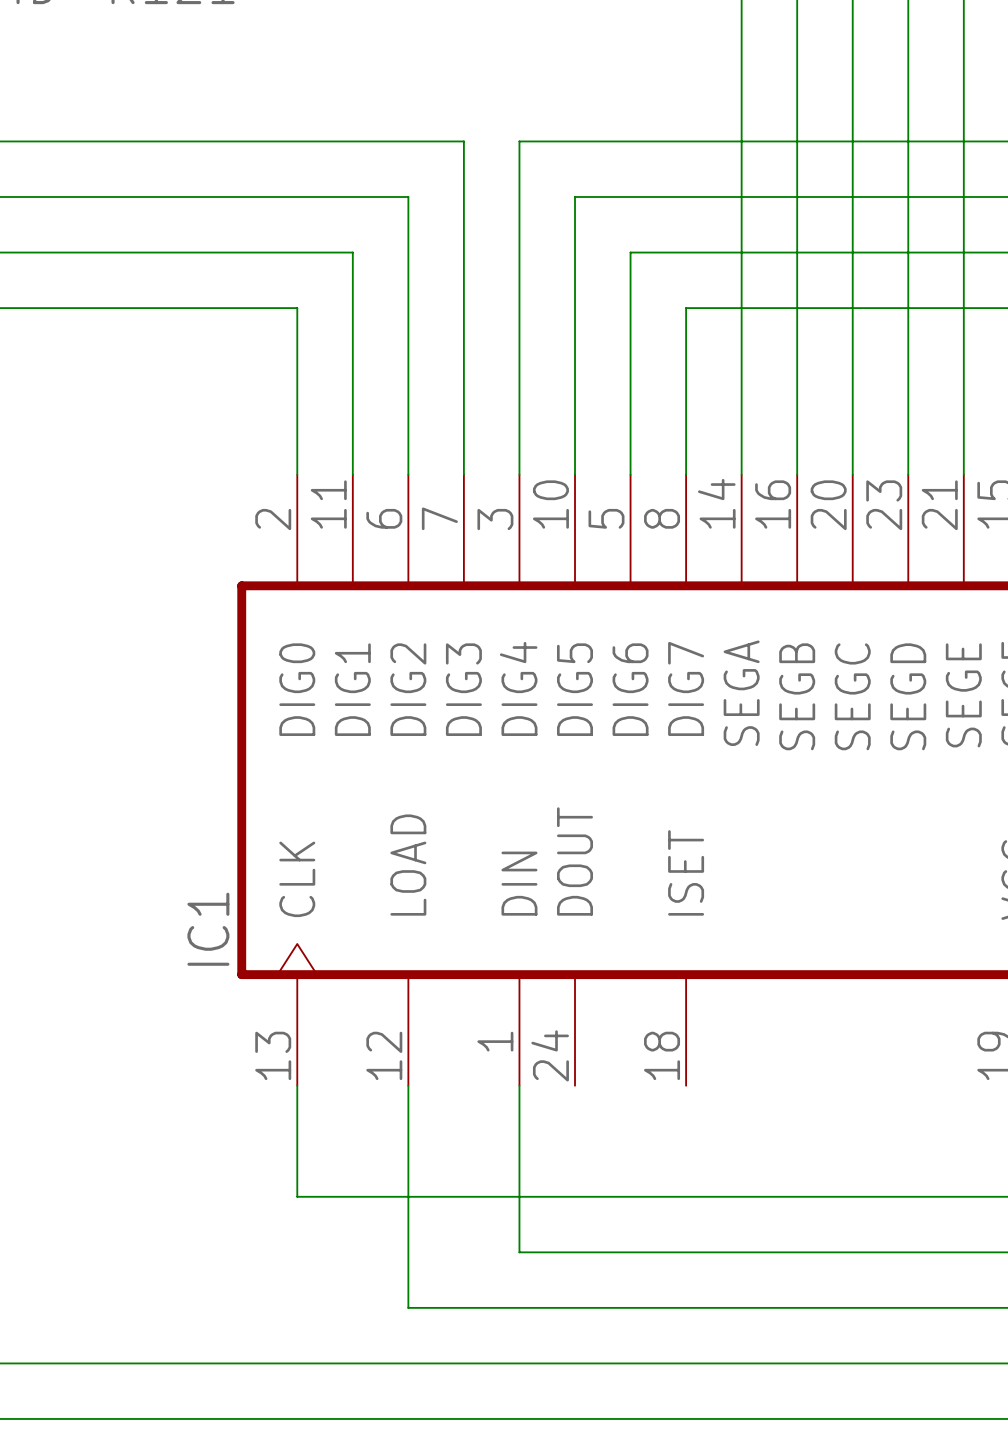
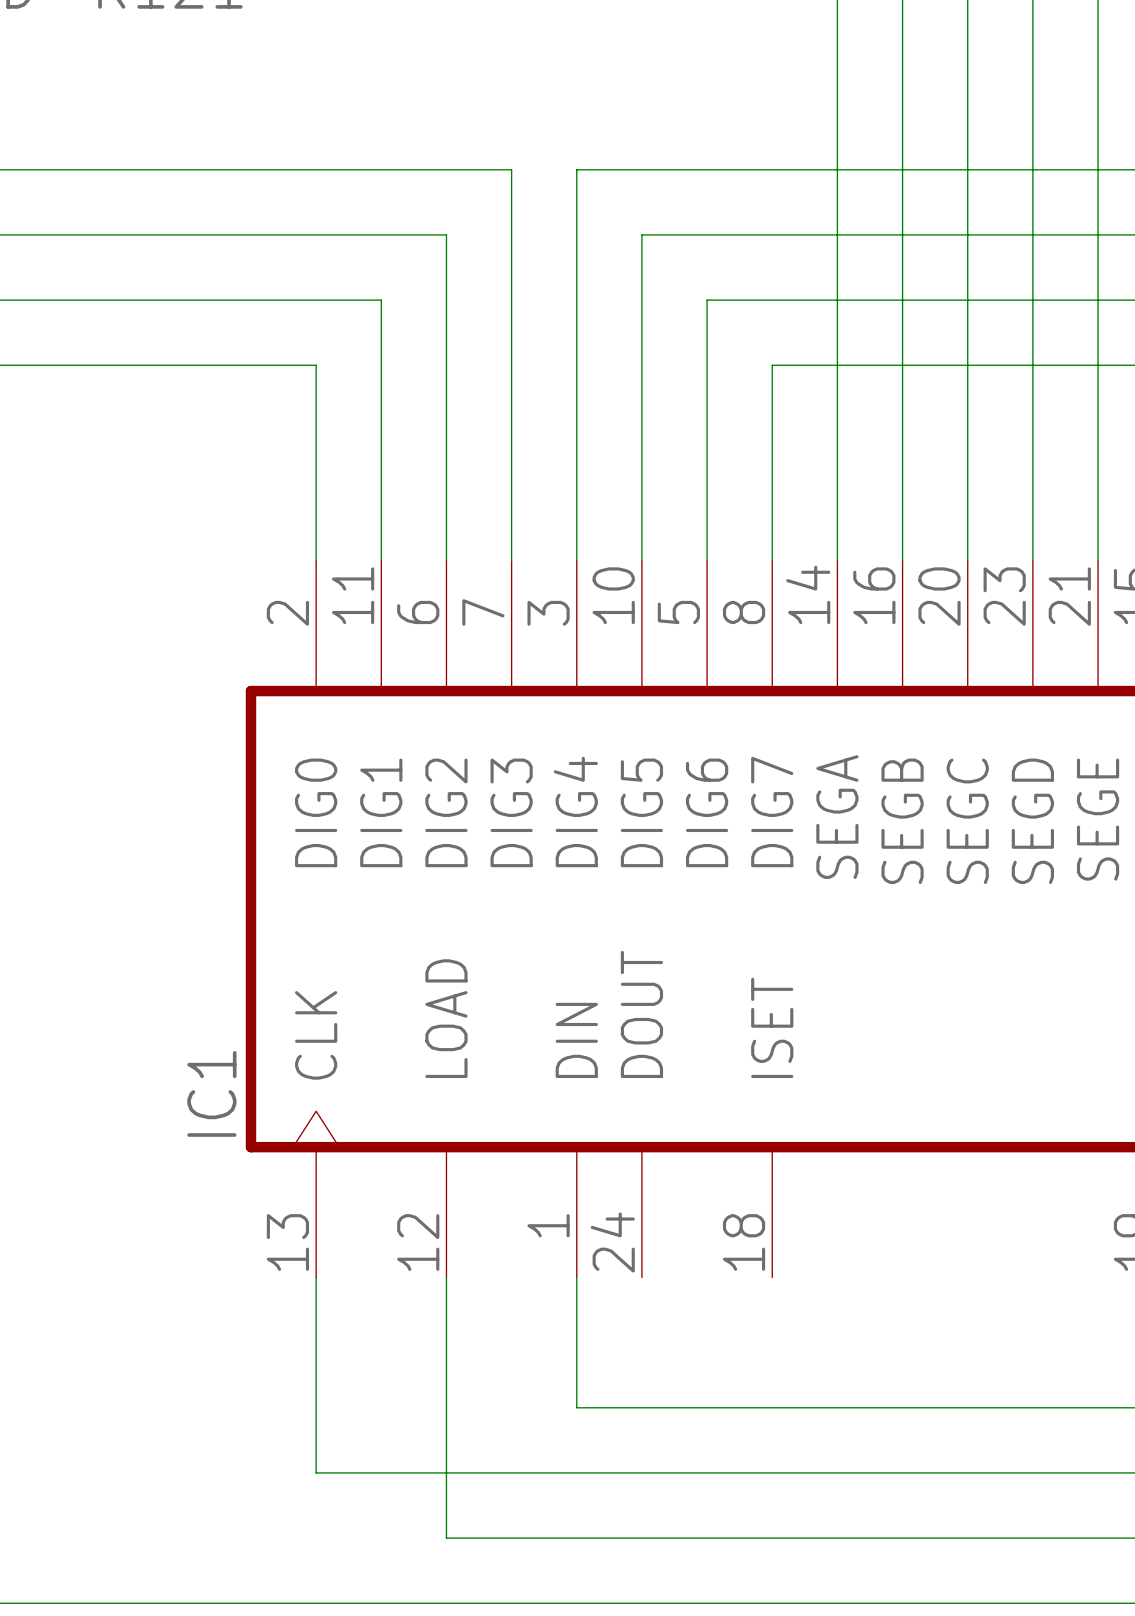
wire: (297, 1196) (519, 1196) (519, 1252) -> (316, 1407) (316, 1472) (576, 1472)

